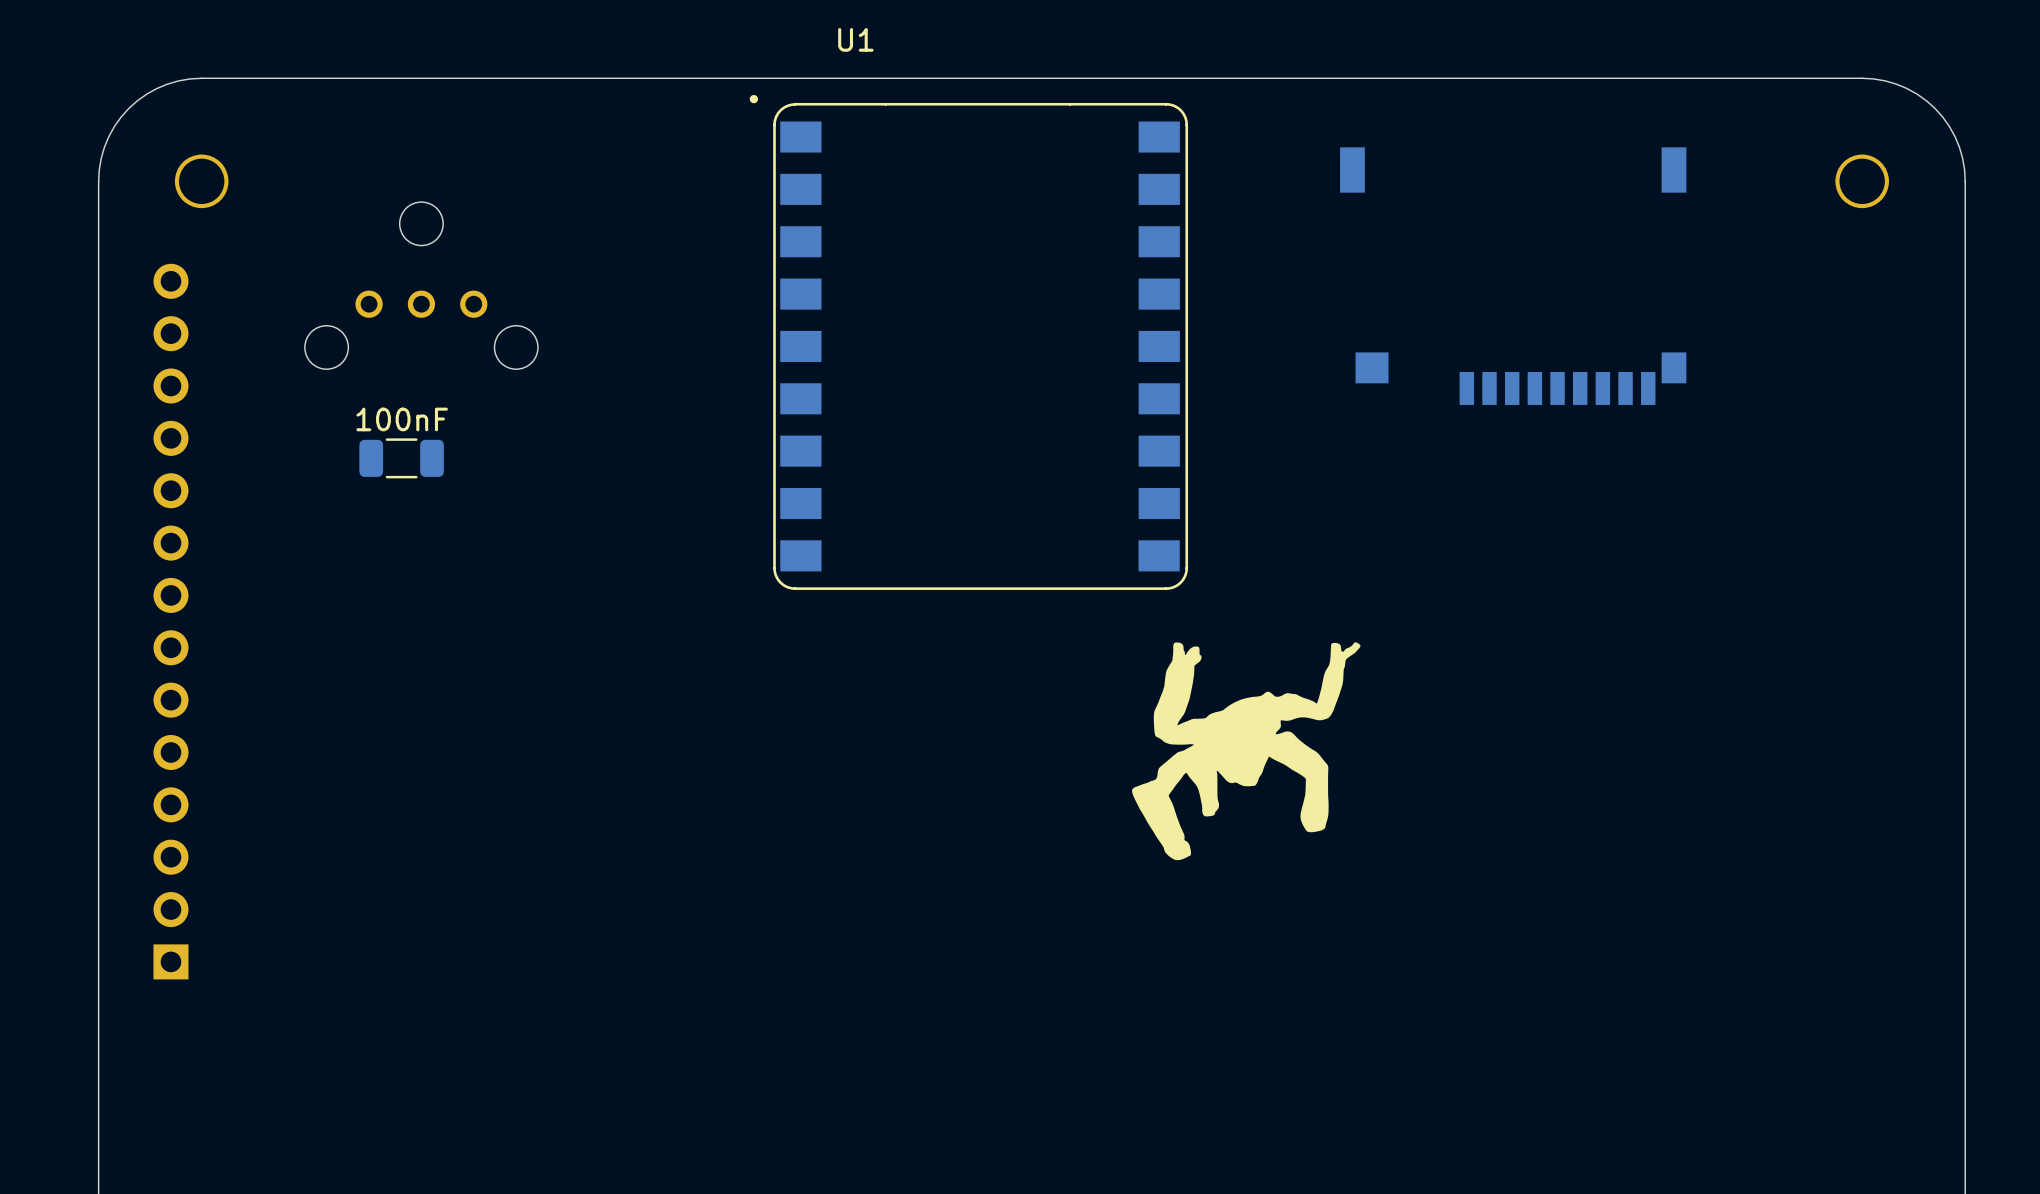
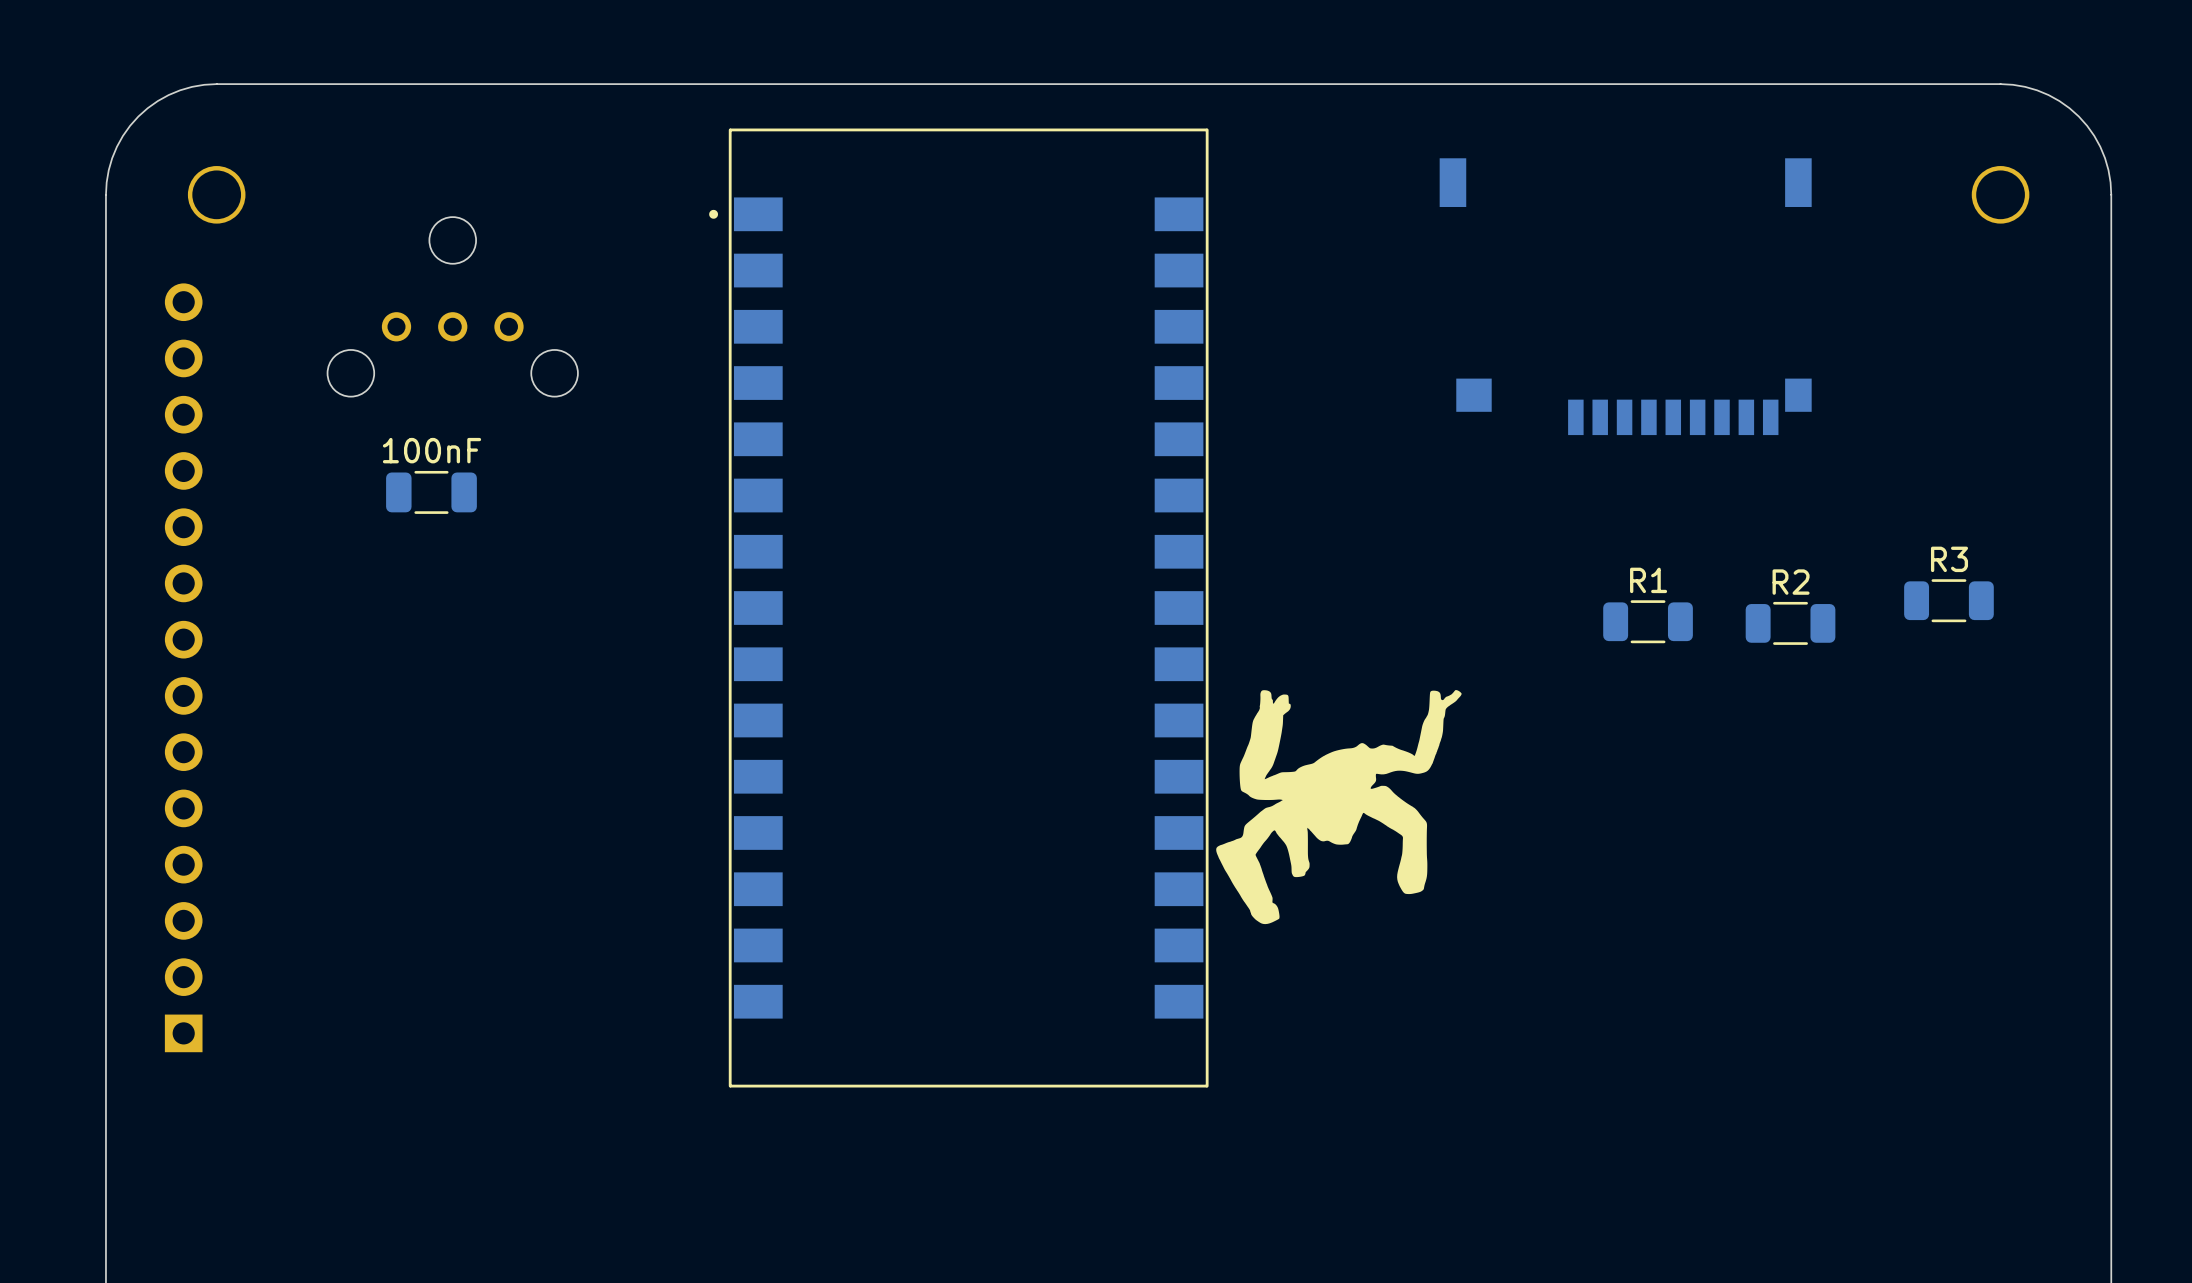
U1: (968, 342) -> none
R3: none -> (1948, 600)
part: none -> (958, 608)
R1: none -> (1648, 621)
R2: none -> (1790, 623)

